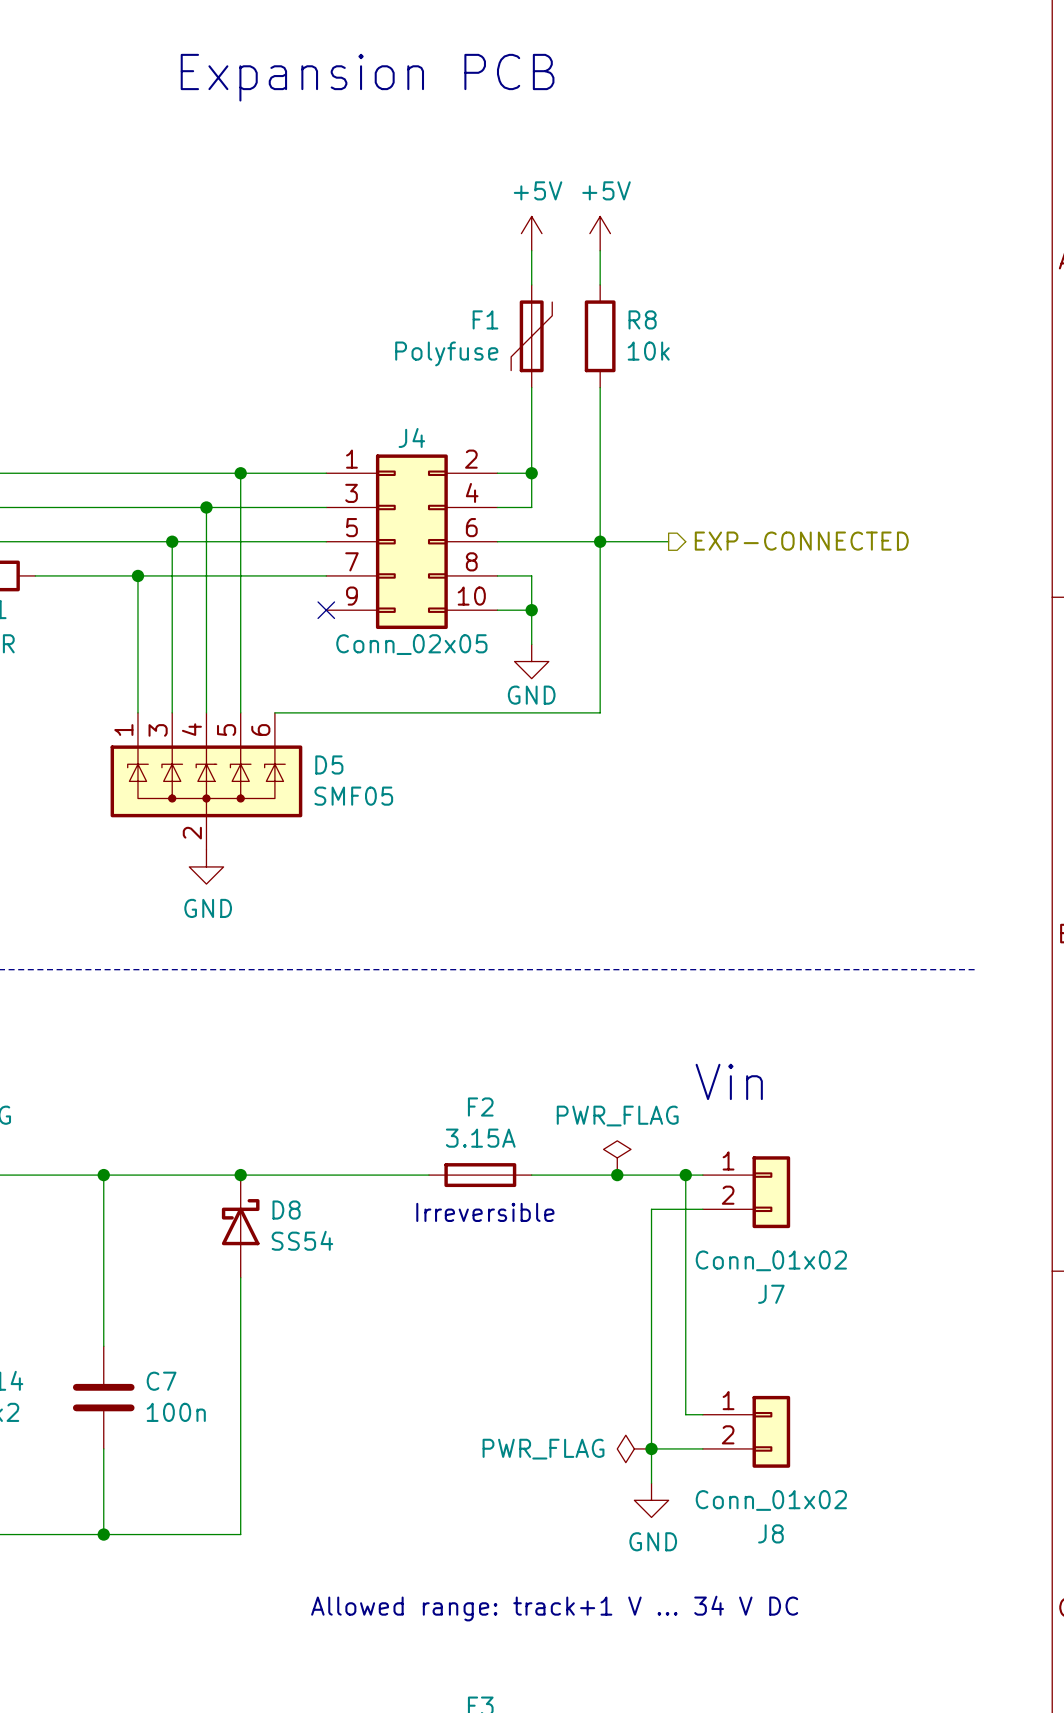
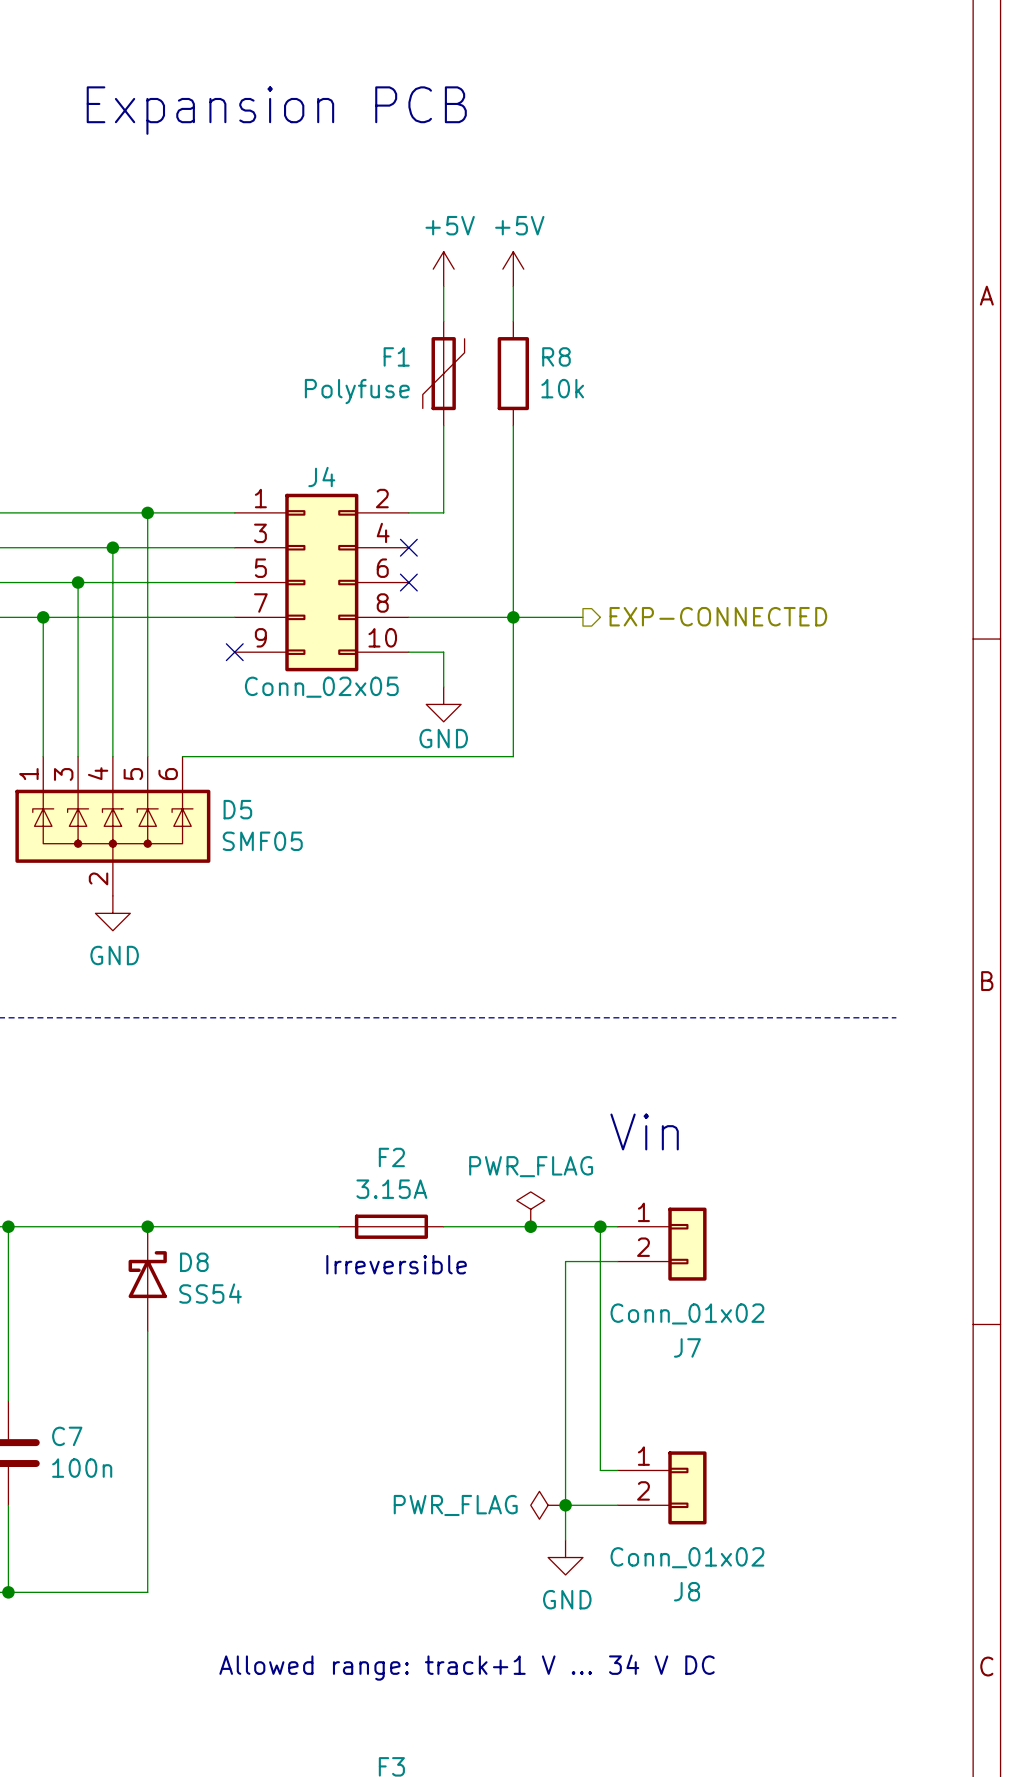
wire: (531, 473) (531, 507) (497, 507) -> none
junction: (531, 473) -> none
no-connect mark: none -> (408, 547)
wire: (497, 541) (668, 541) -> none
no-connect mark: none -> (408, 582)
junction position: (600, 541) -> (513, 617)
hierarchical label position: EXP-CONNECTED (801, 541) -> EXP-CONNECTED (718, 616)
wire: (531, 575) (531, 610) -> (443, 617) (582, 617)
junction: (531, 610) -> none

